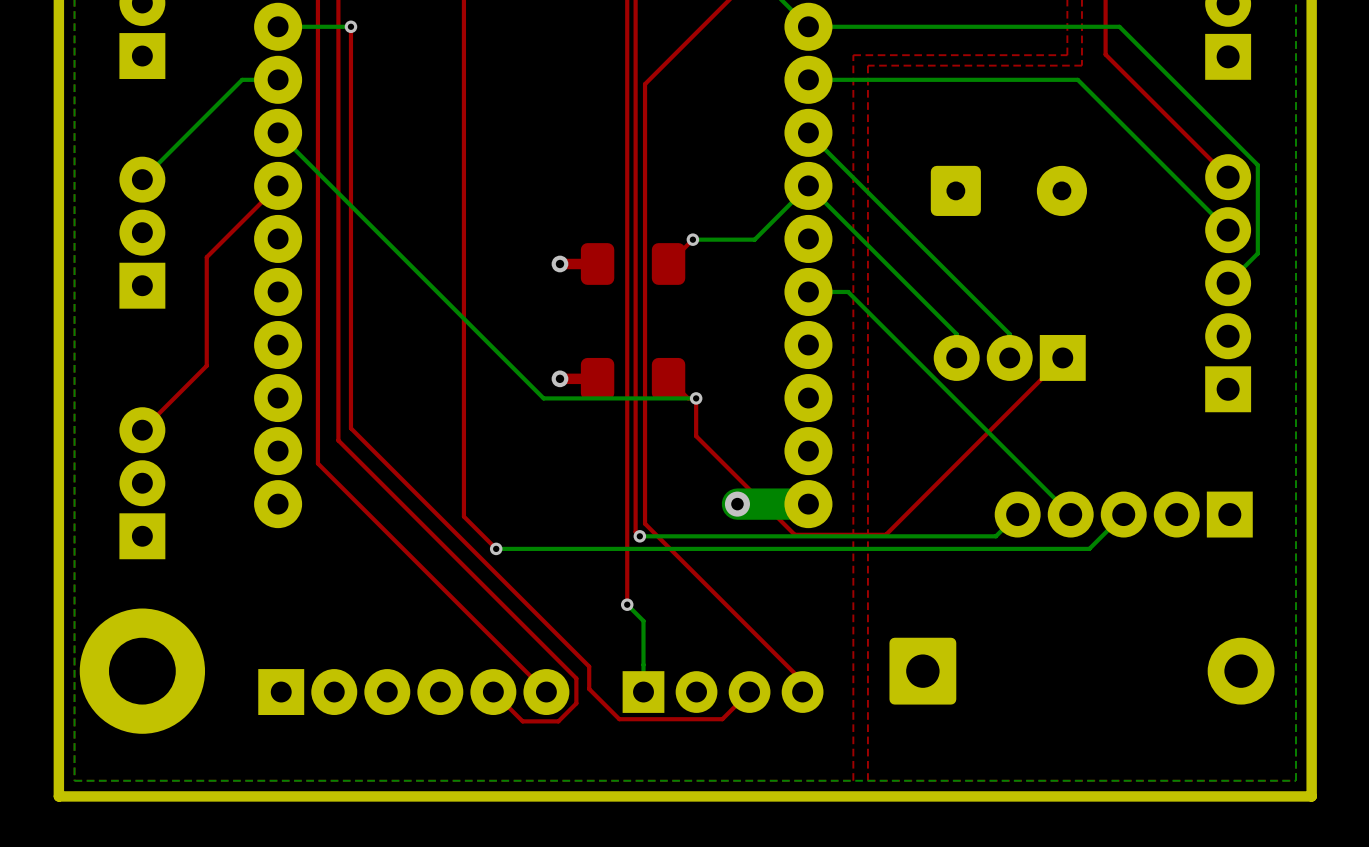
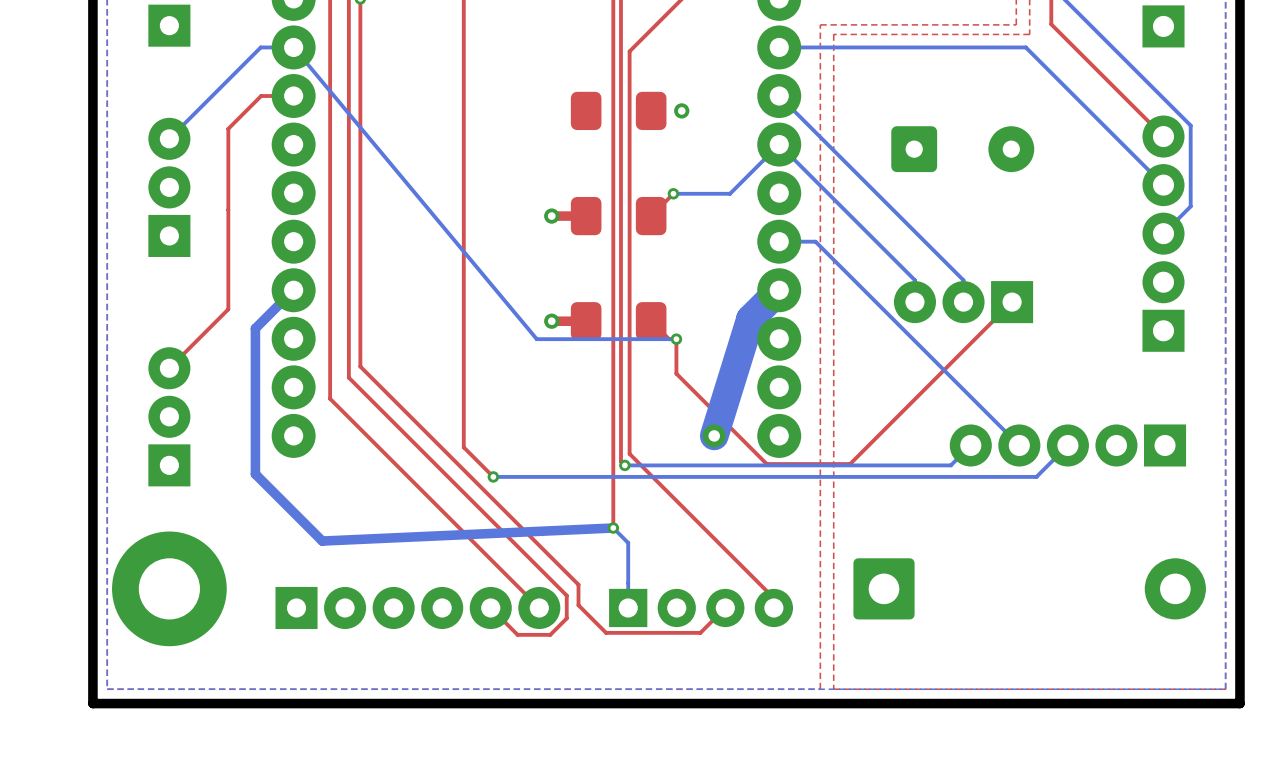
bottom track: (278, 132) (543, 398) -> (293, 47) (536, 339)
part: none -> (618, 110)
via: none -> (681, 110)
top track: (278, 185) (206, 257) -> (293, 96) (261, 96) (228, 128) (228, 209)
bottom track: none -> (293, 290) (255, 328) (255, 474) (322, 541) (613, 528)
bottom track: (808, 504) (737, 504) -> (779, 290) (750, 318) (714, 435)

